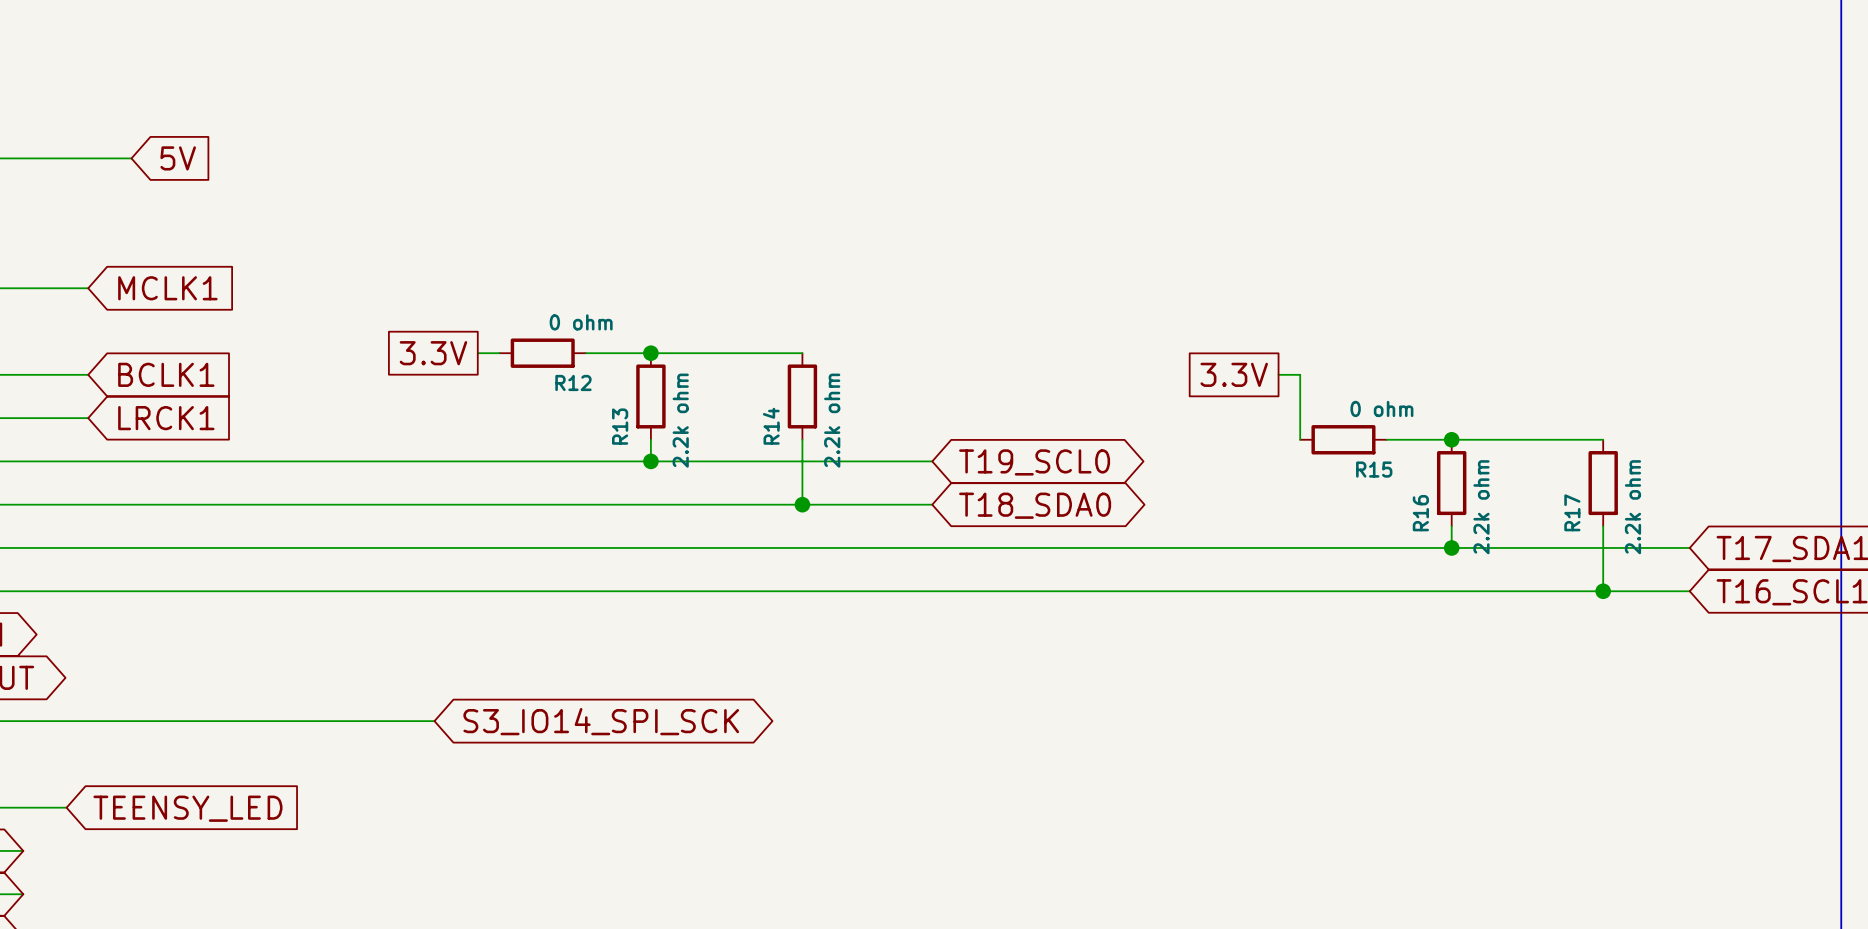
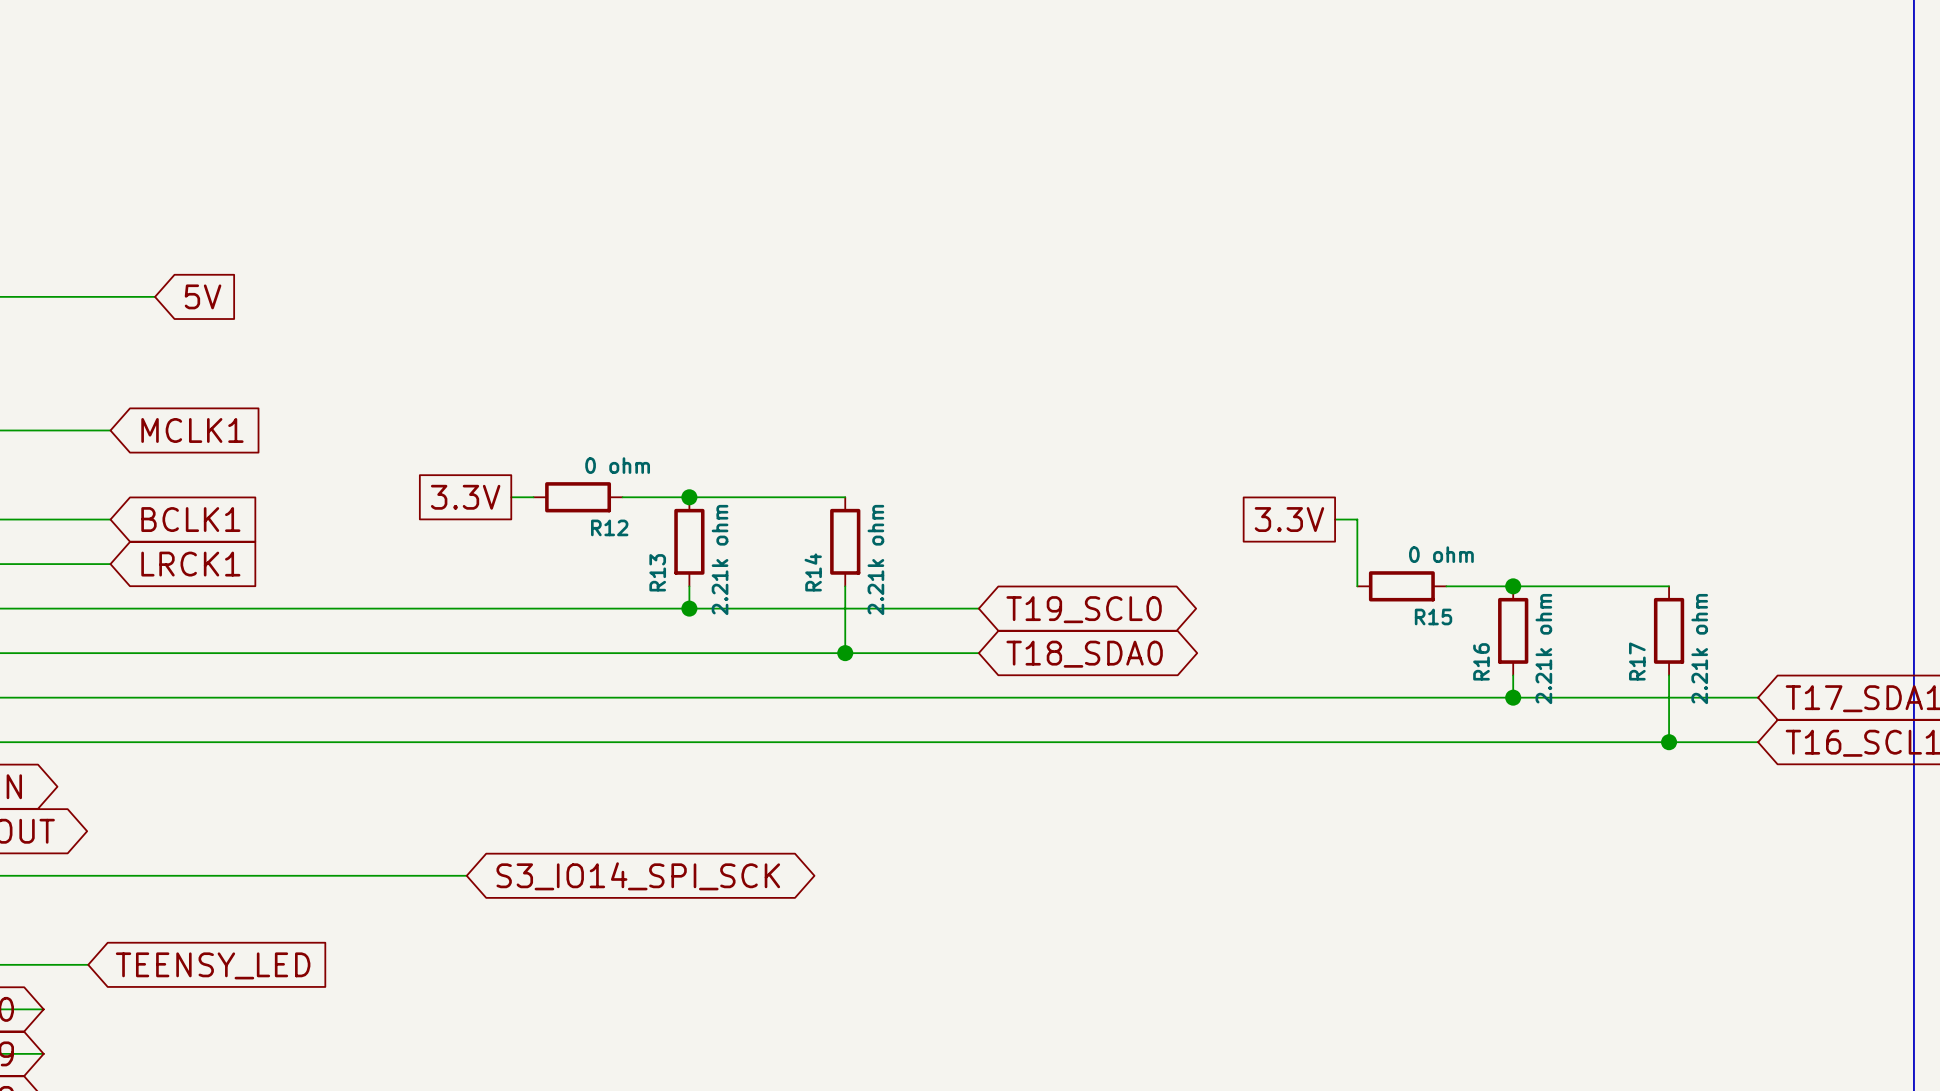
R13 value: 2.2k ohm (680, 420) -> 2.21k ohm (720, 559)
R14 value: 2.2k ohm (832, 420) -> 2.21k ohm (875, 559)
R16 value: 2.2k ohm (1481, 507) -> 2.21k ohm (1543, 649)
R17 value: 2.2k ohm (1632, 507) -> 2.21k ohm (1699, 649)

